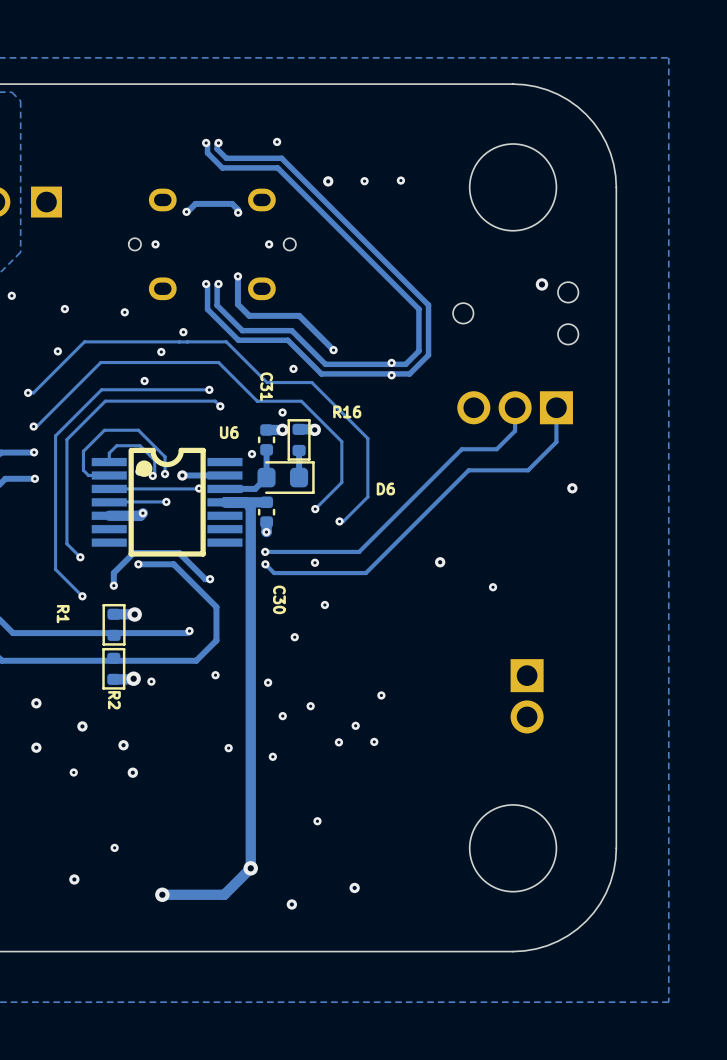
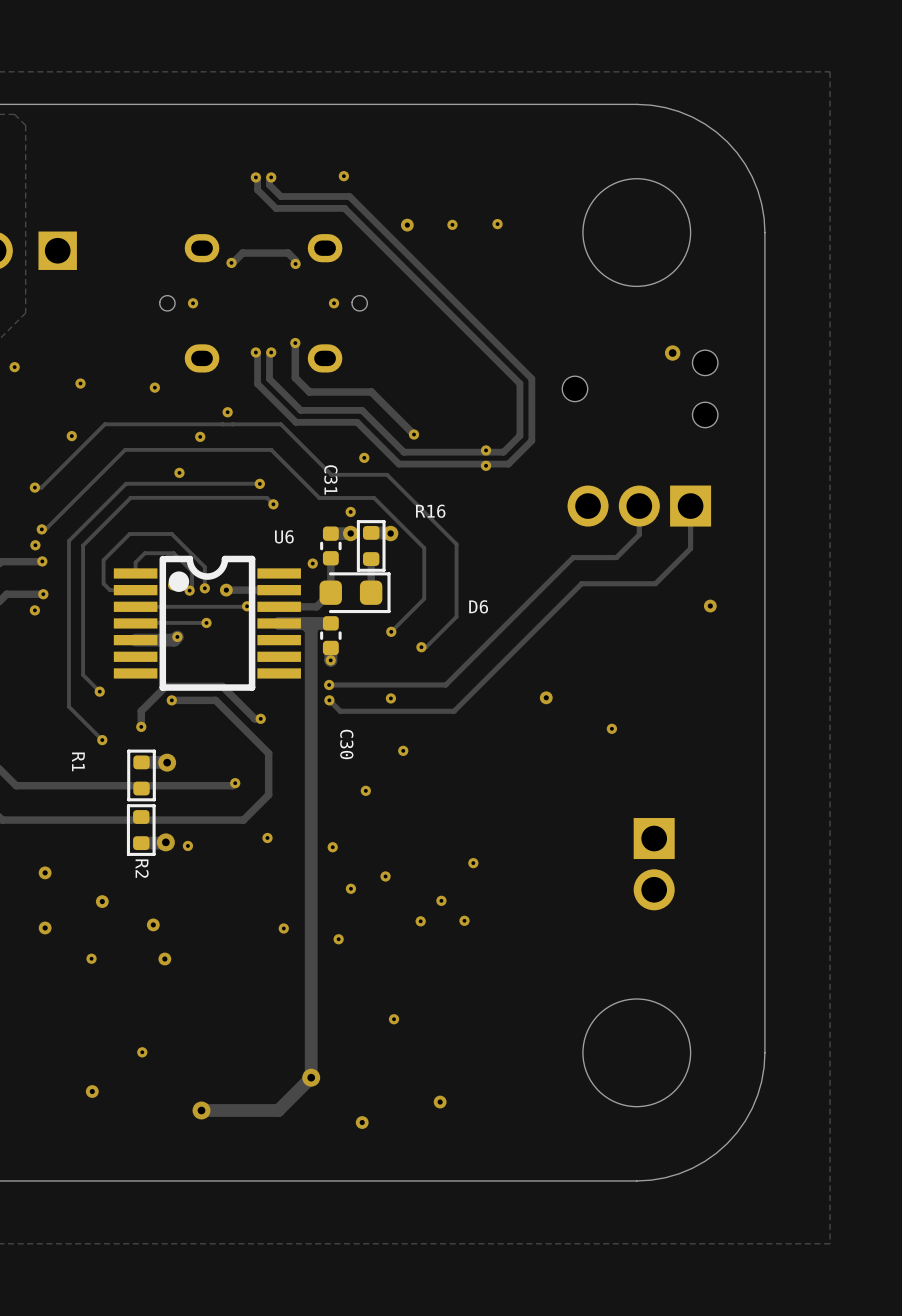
via: none -> (35, 545)
via: none -> (34, 610)

